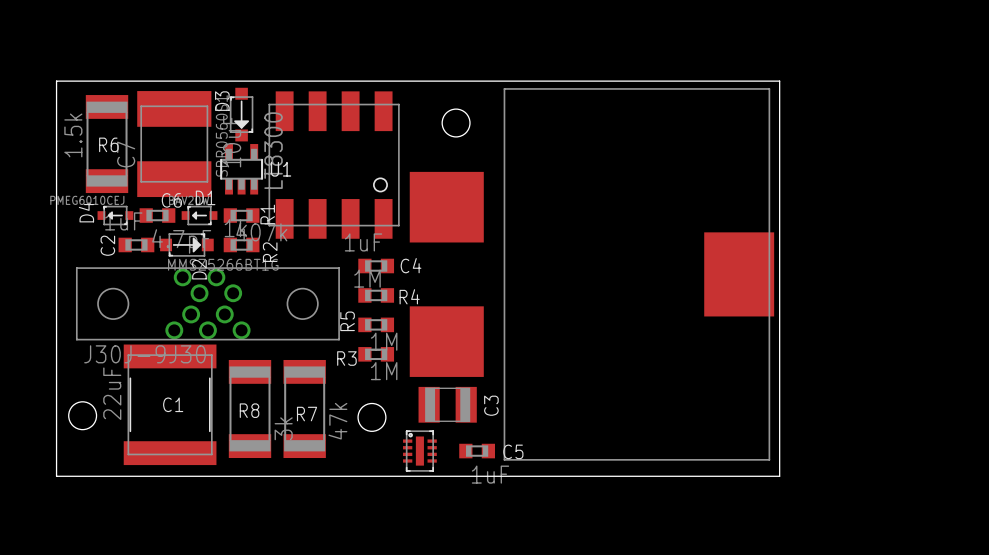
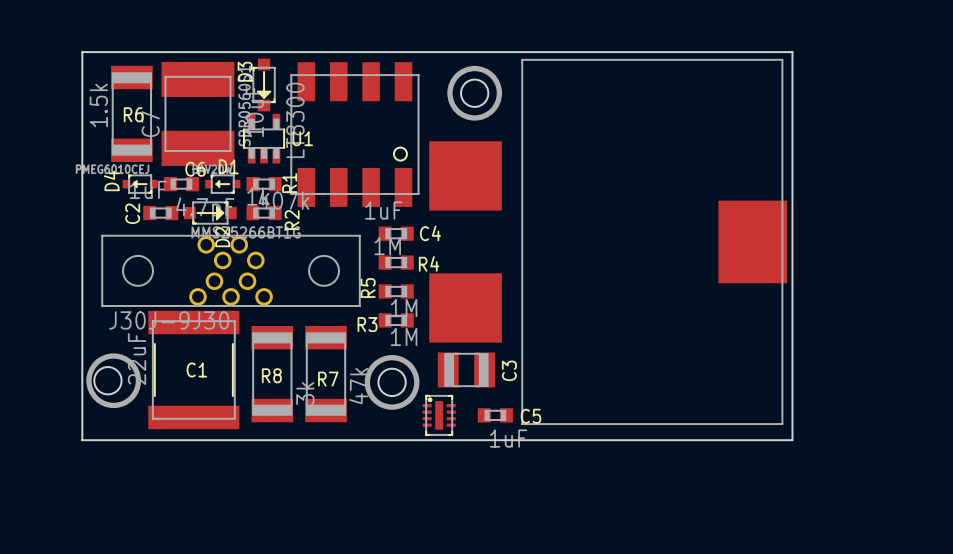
drawing: none -> [447, 65, 503, 121]
drawing: none -> [86, 353, 142, 409]
drawing: none -> [364, 355, 420, 410]

